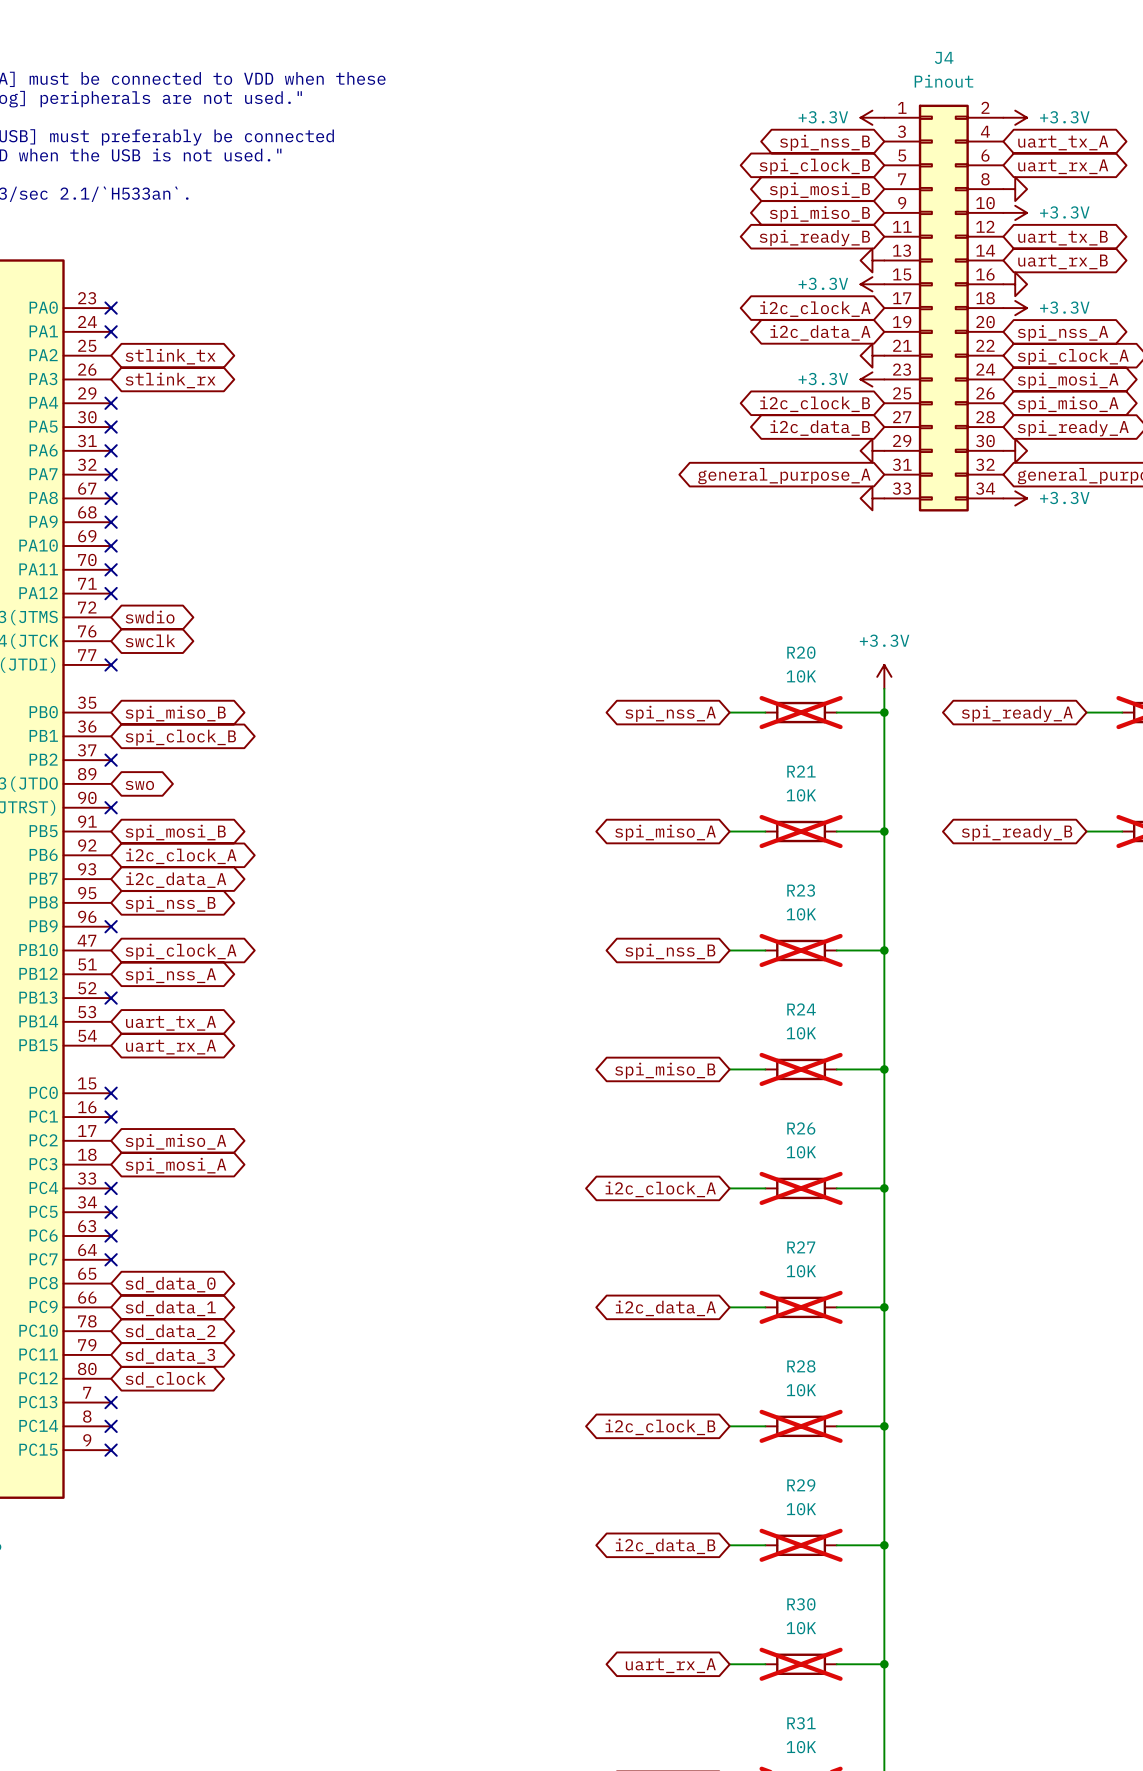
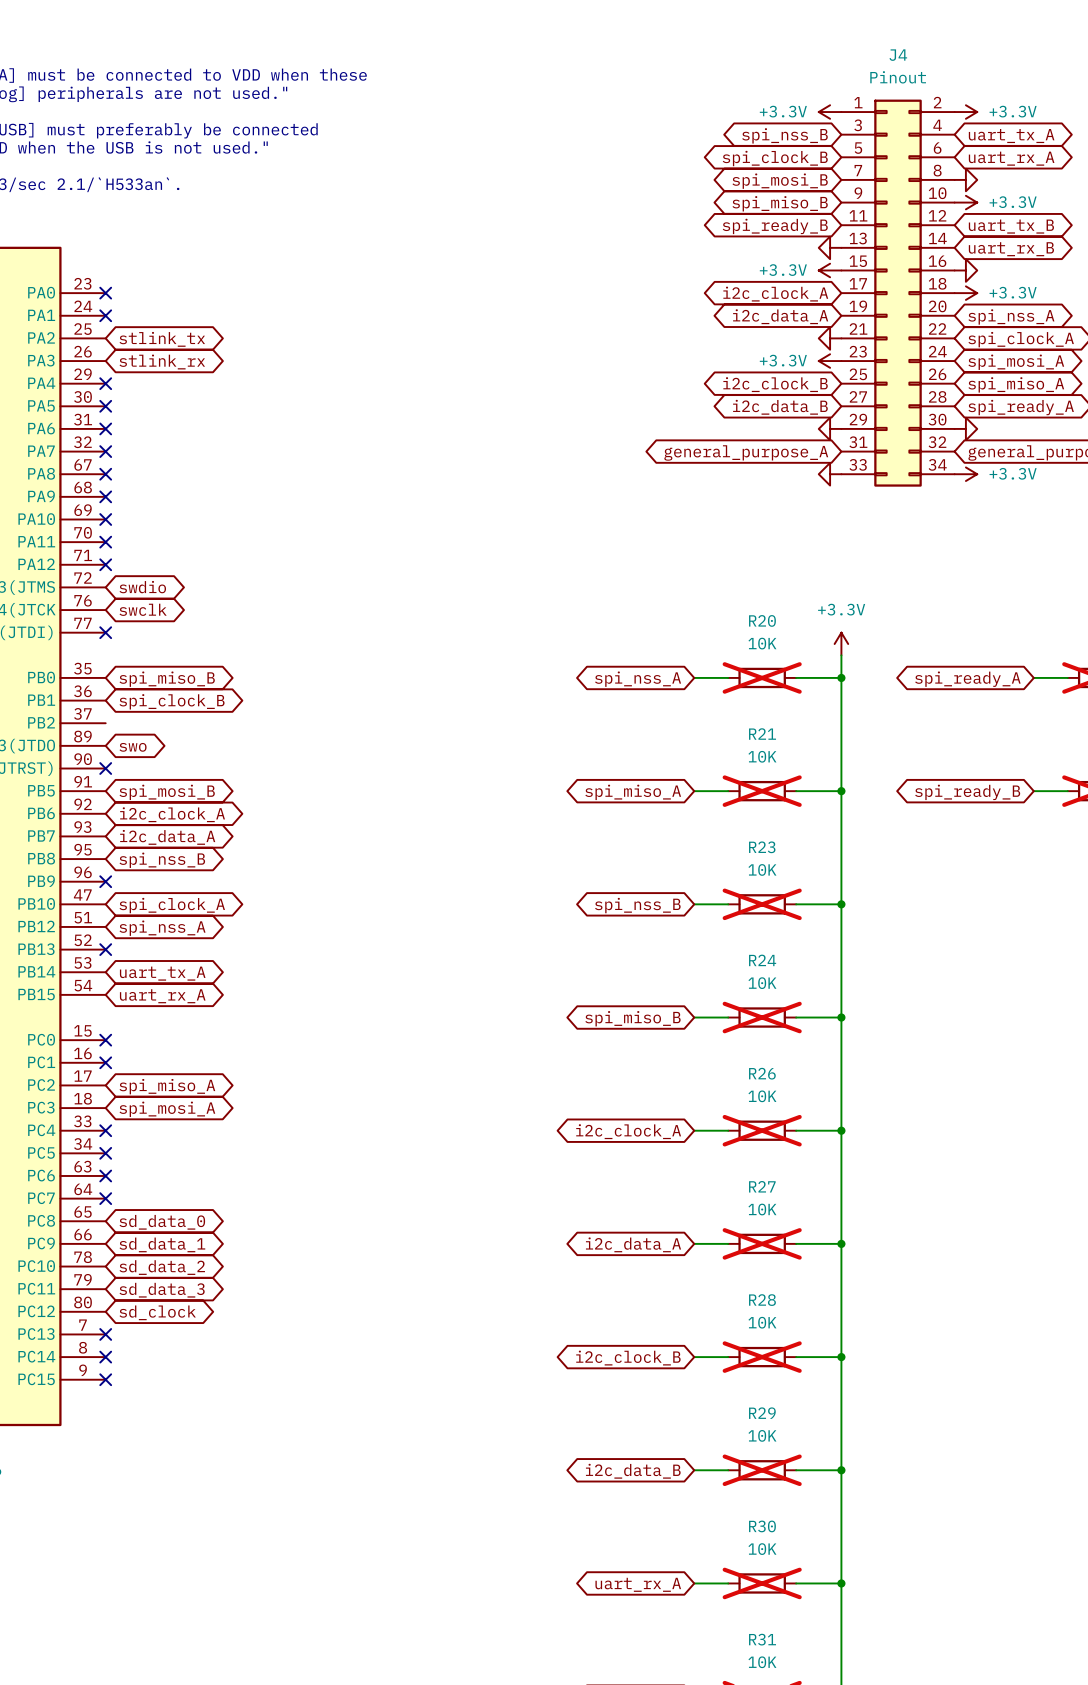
no-connect mark: (111, 760) -> none

